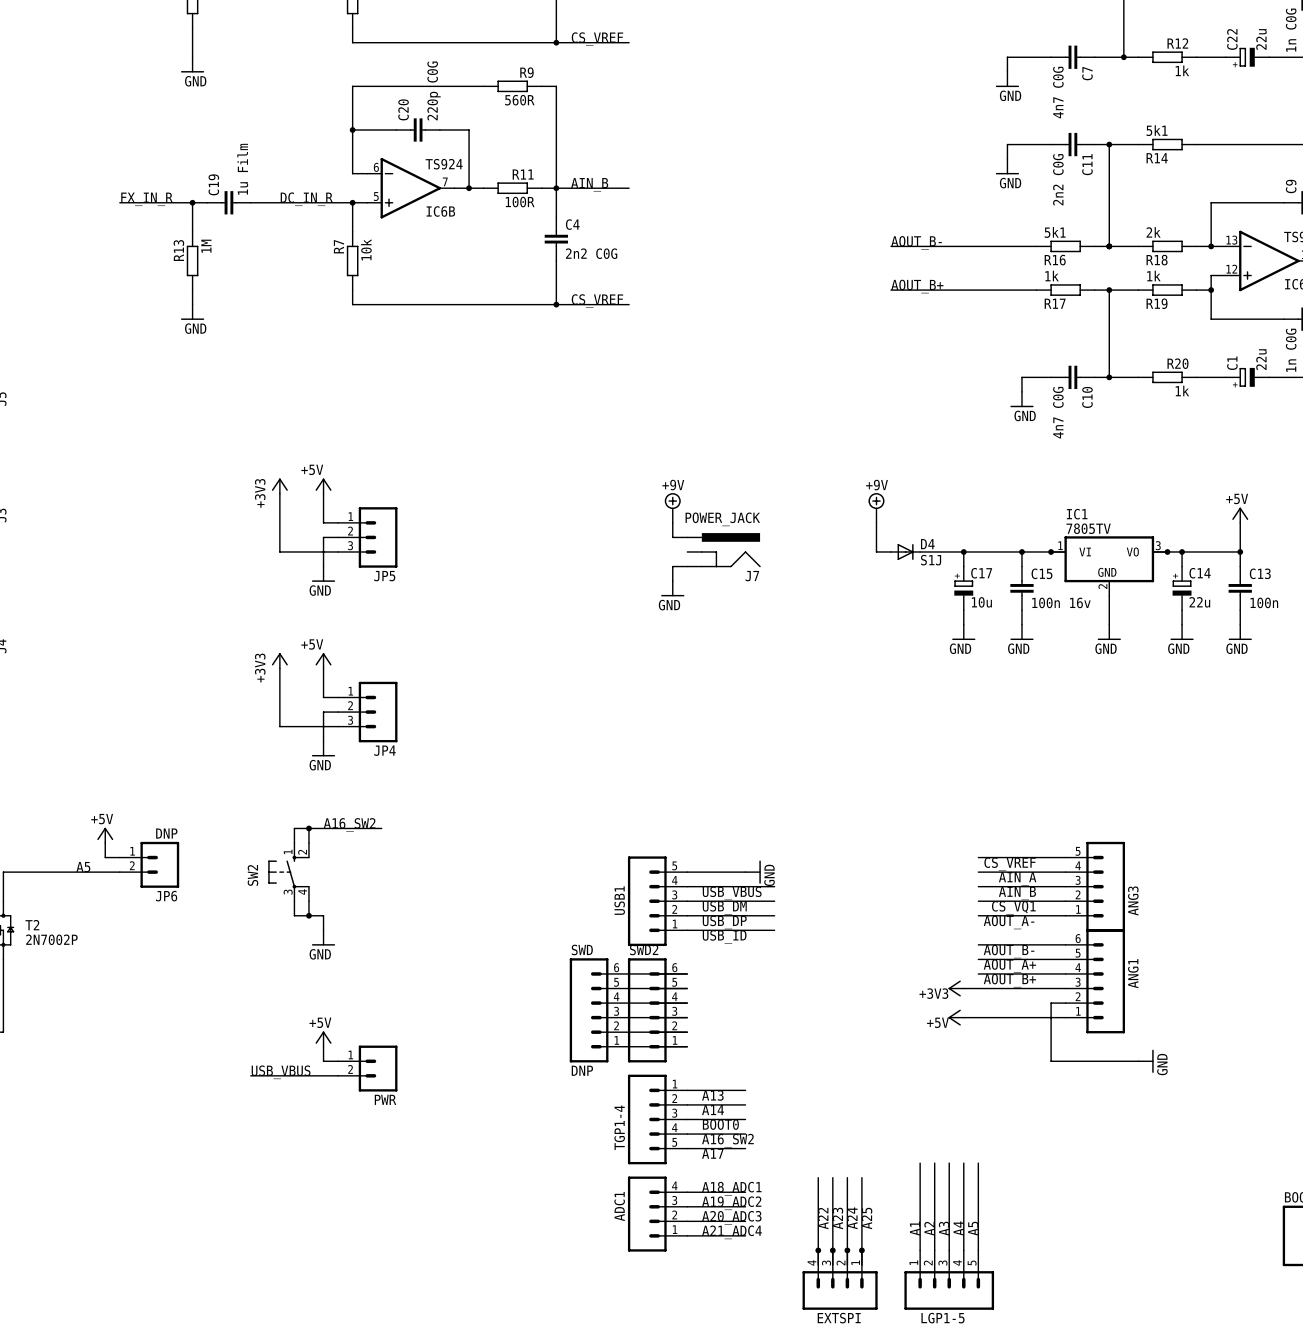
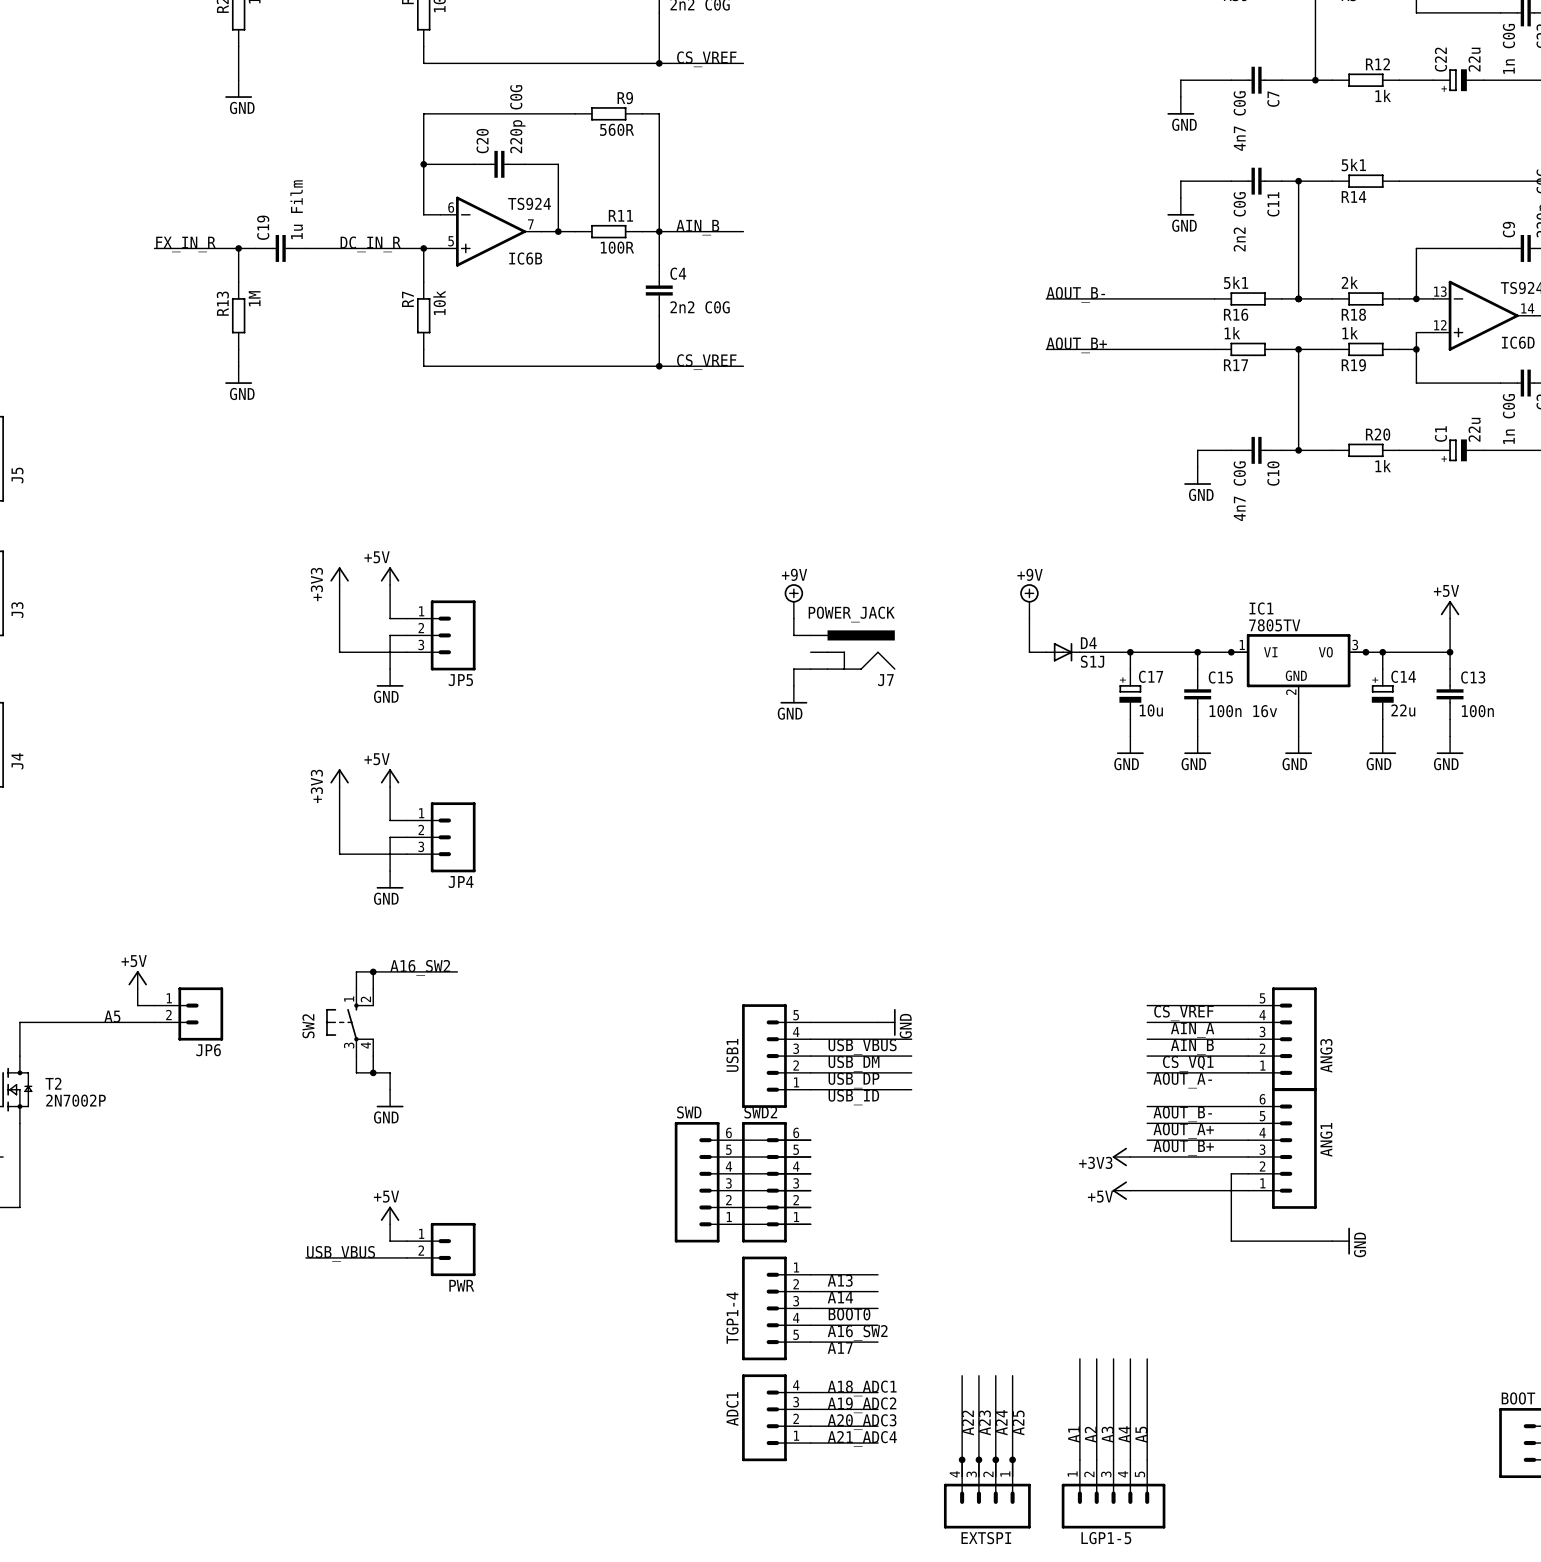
JP6 value: DNP (166, 833) -> none
SWD value: DNP (582, 1070) -> none

